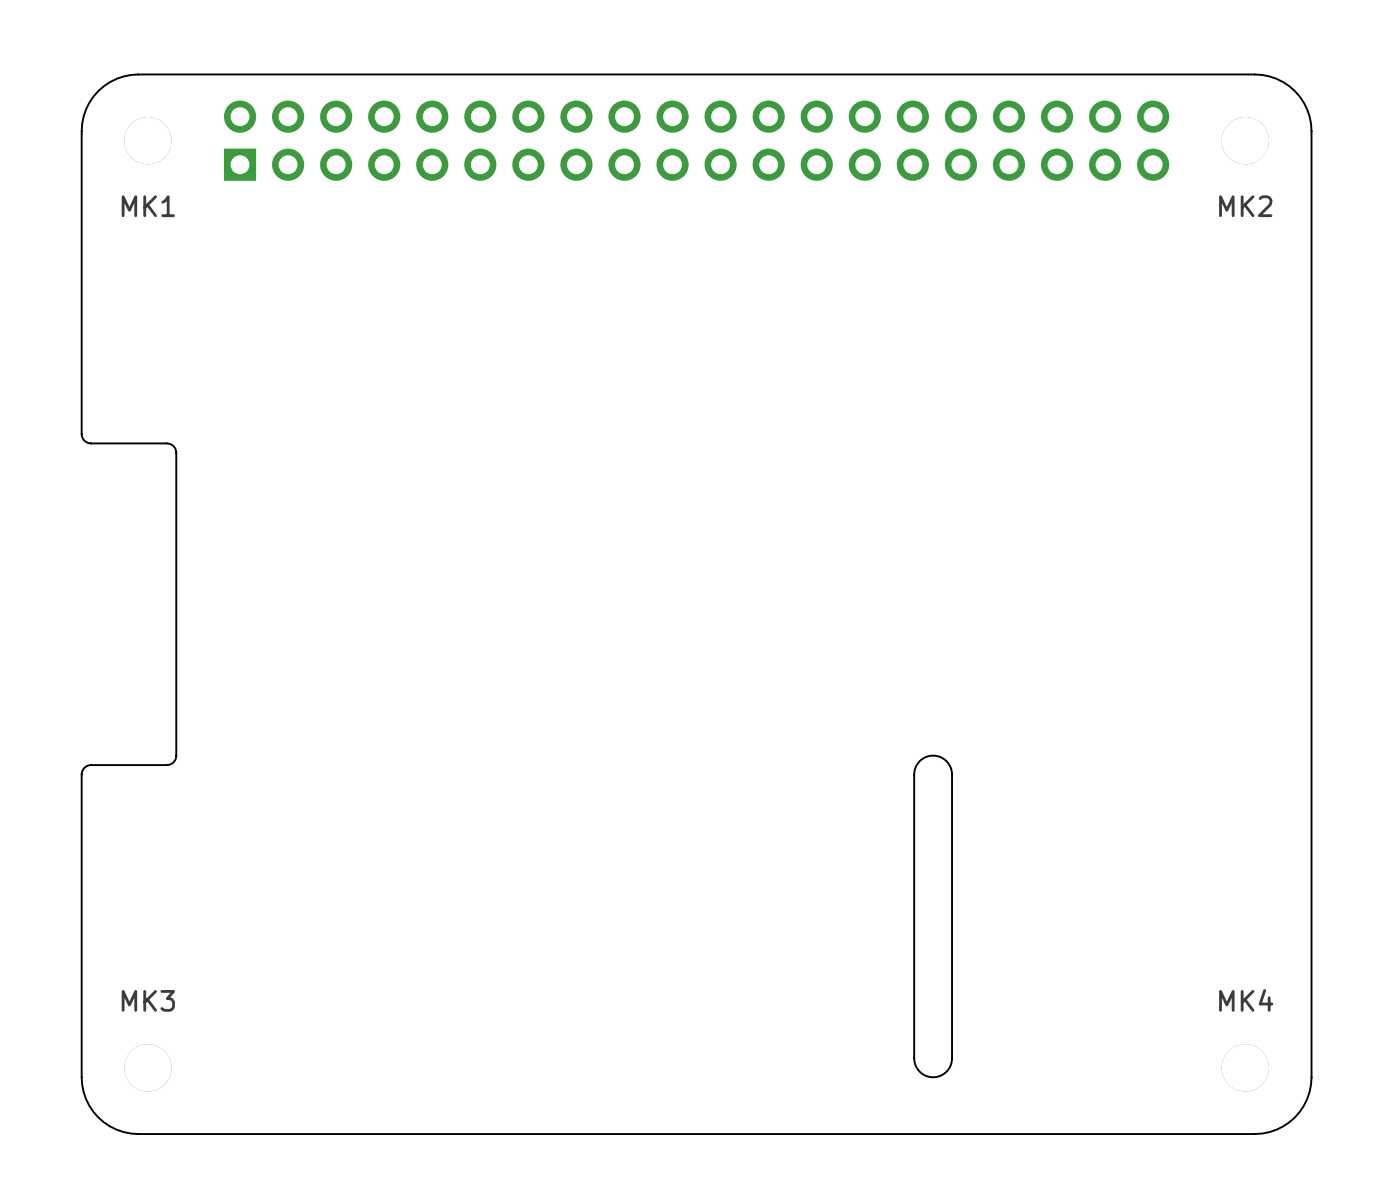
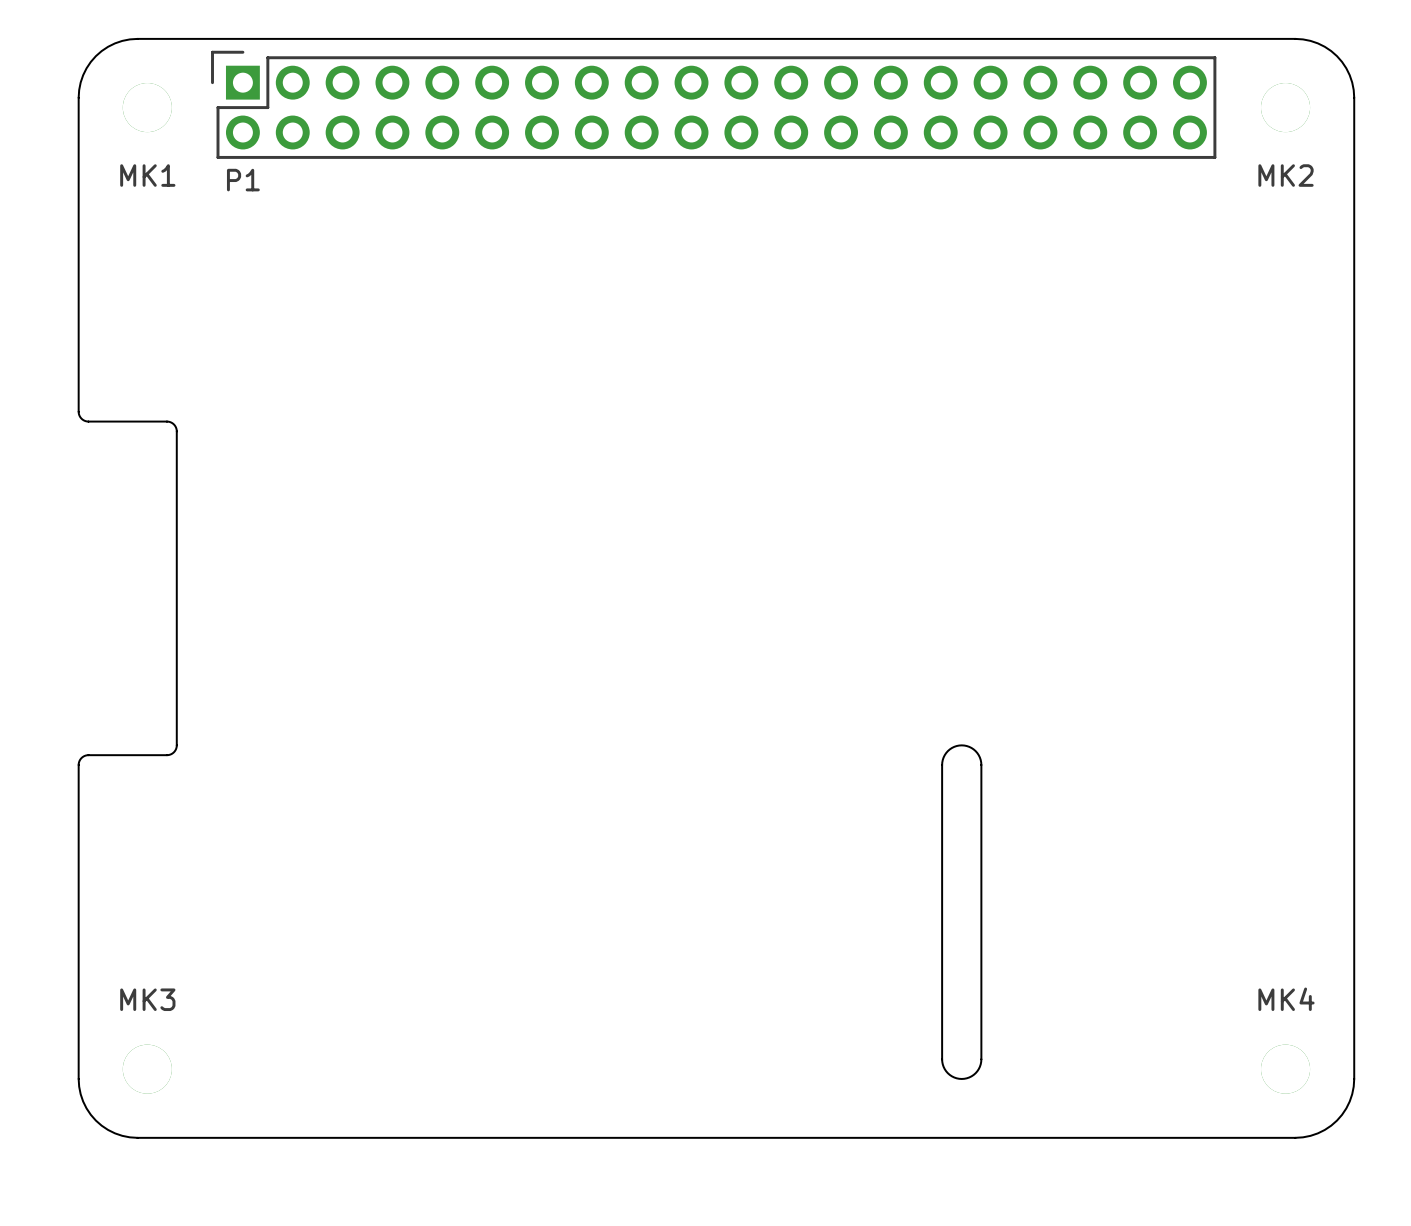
P1: none -> (713, 104)
part: (696, 140) -> none

